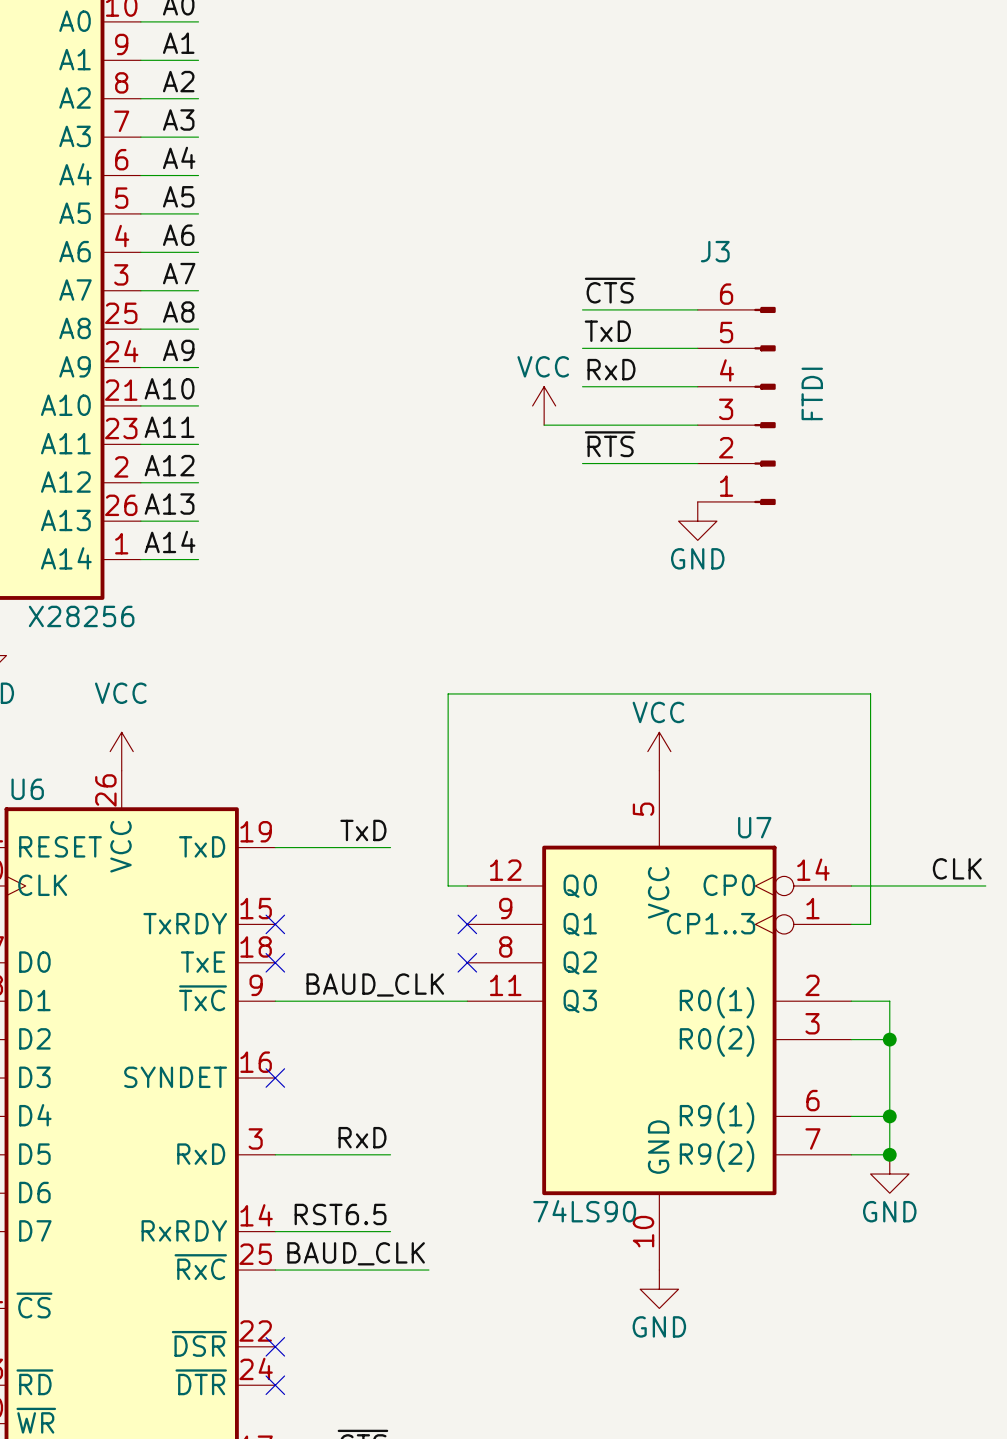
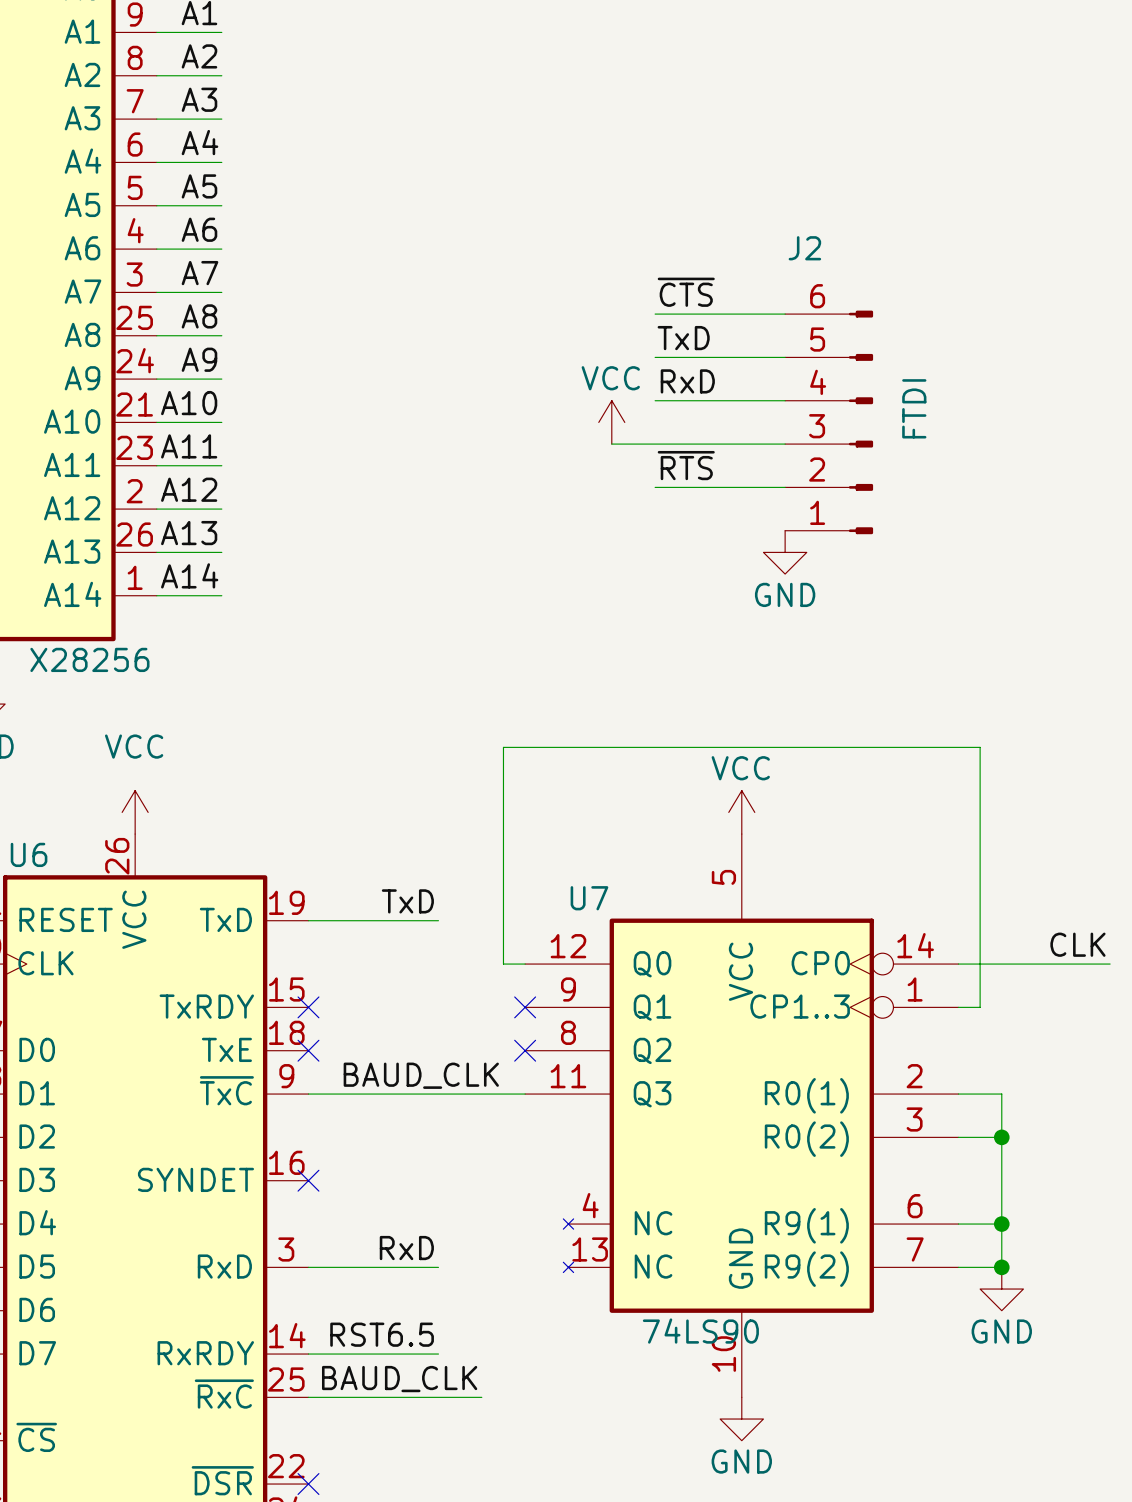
J3 name: J3 (715, 251) -> J2 (804, 248)
U7 symbol: [467, 770, 852, 1271] -> [525, 834, 959, 1398]
U7 name position: U7 (754, 827) -> U7 (589, 898)
U7 value position: 74LS90 (584, 1211) -> 74LS90 (700, 1331)

